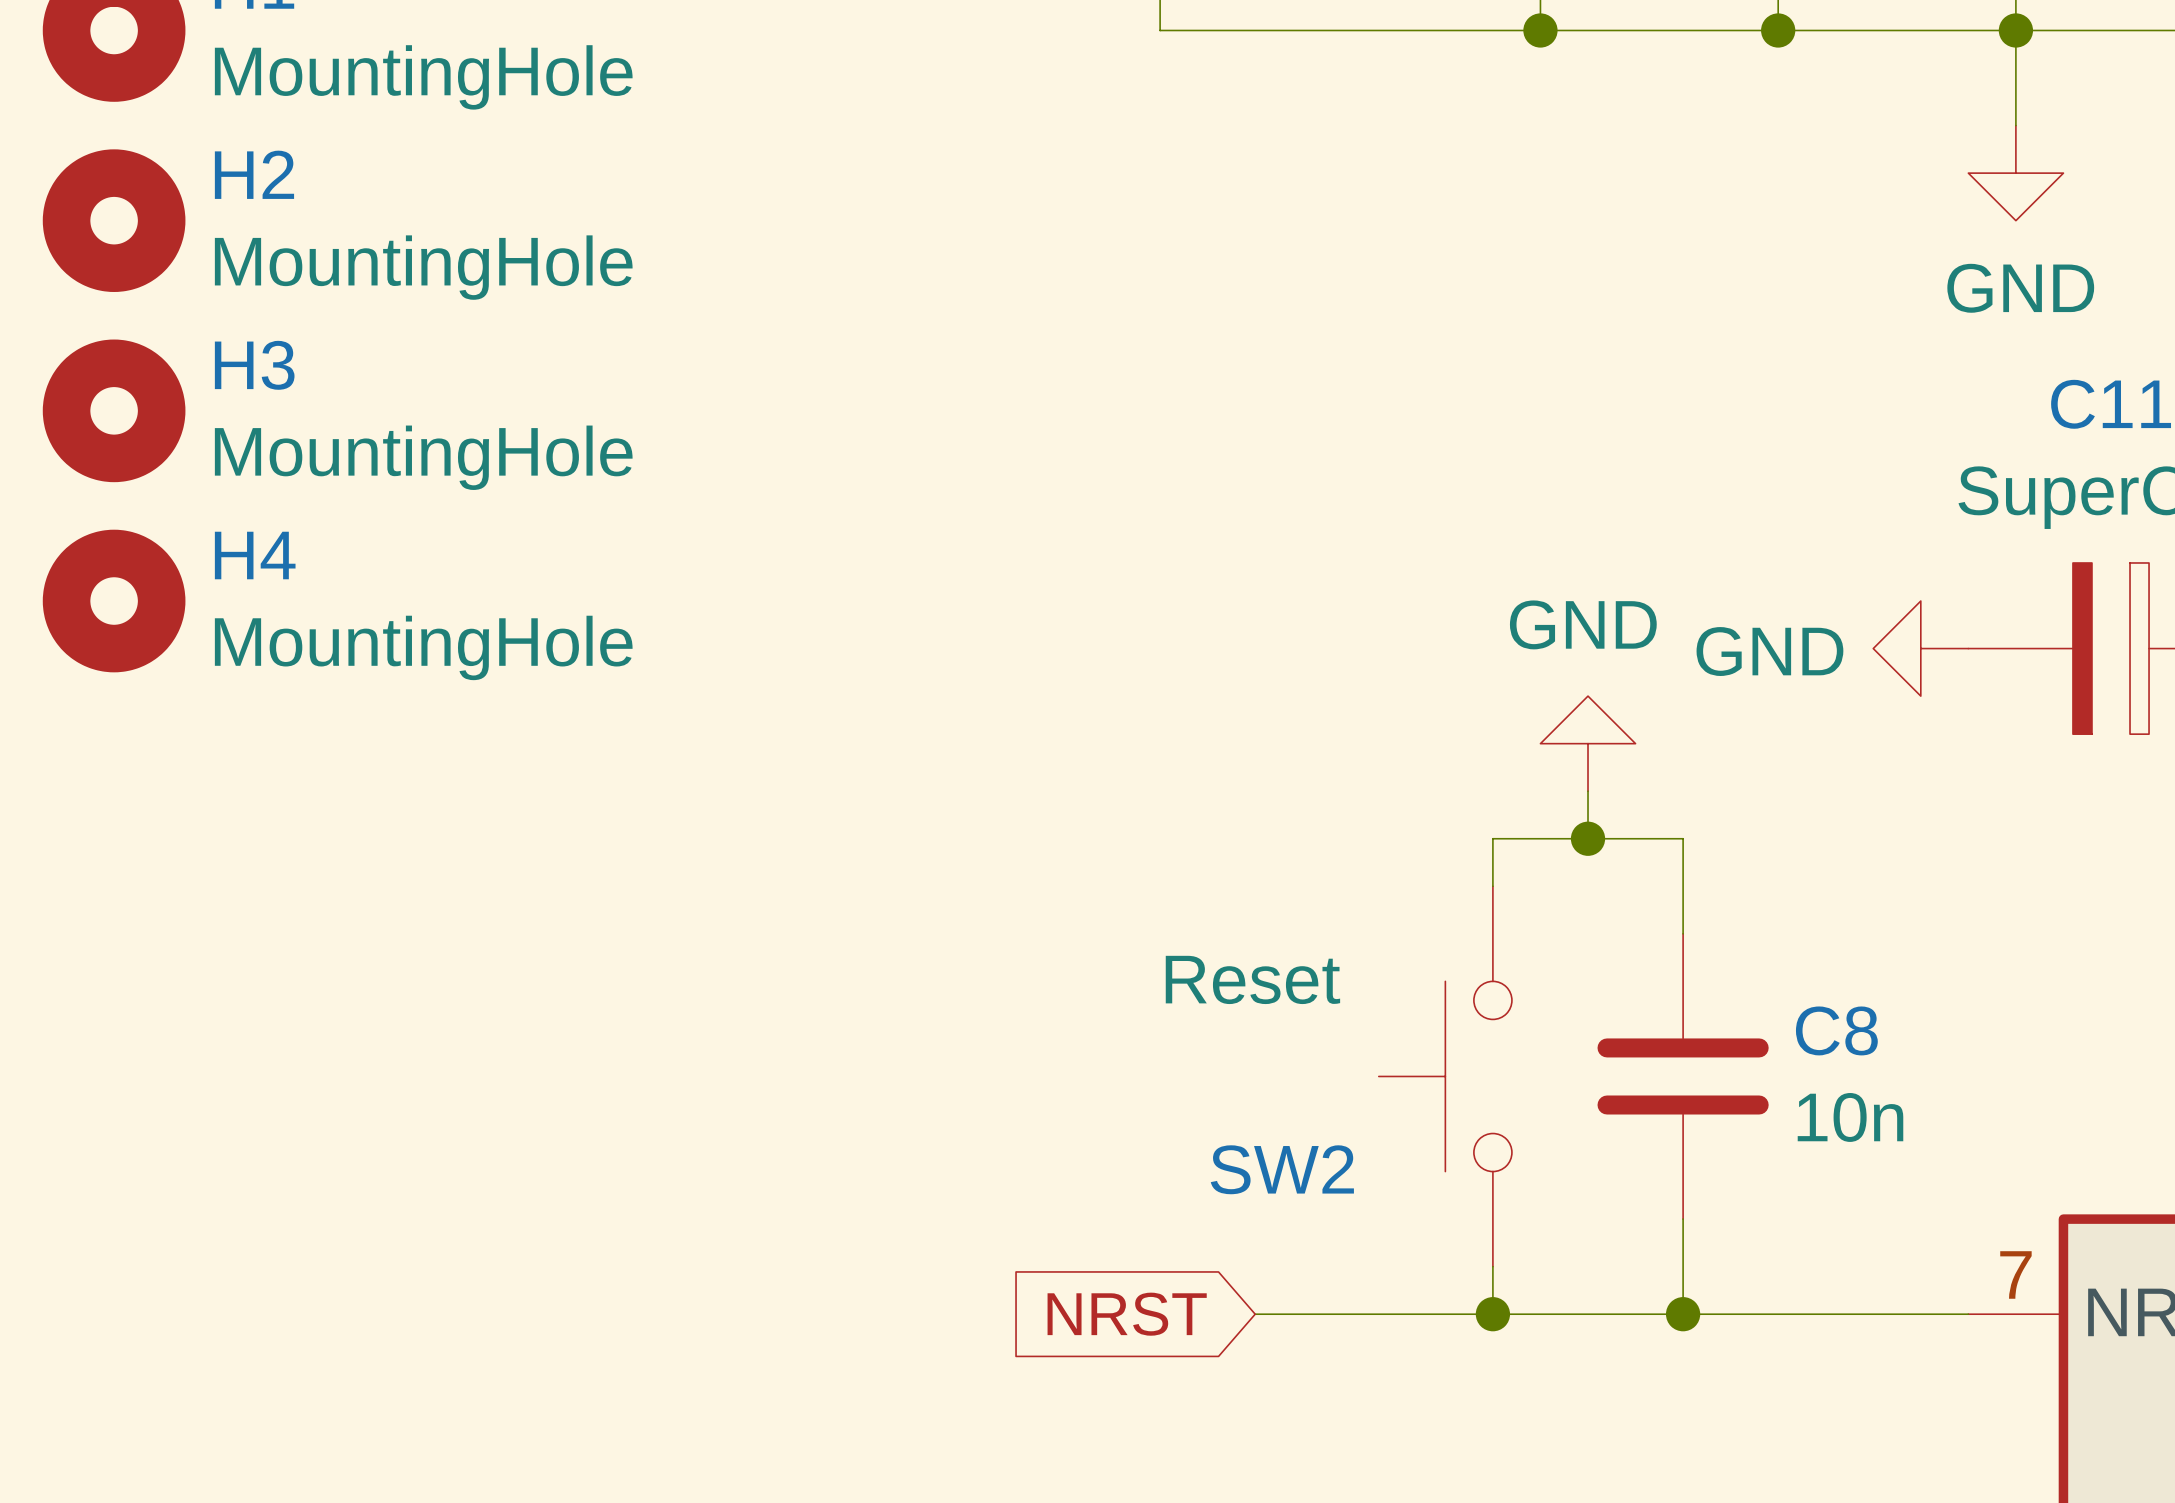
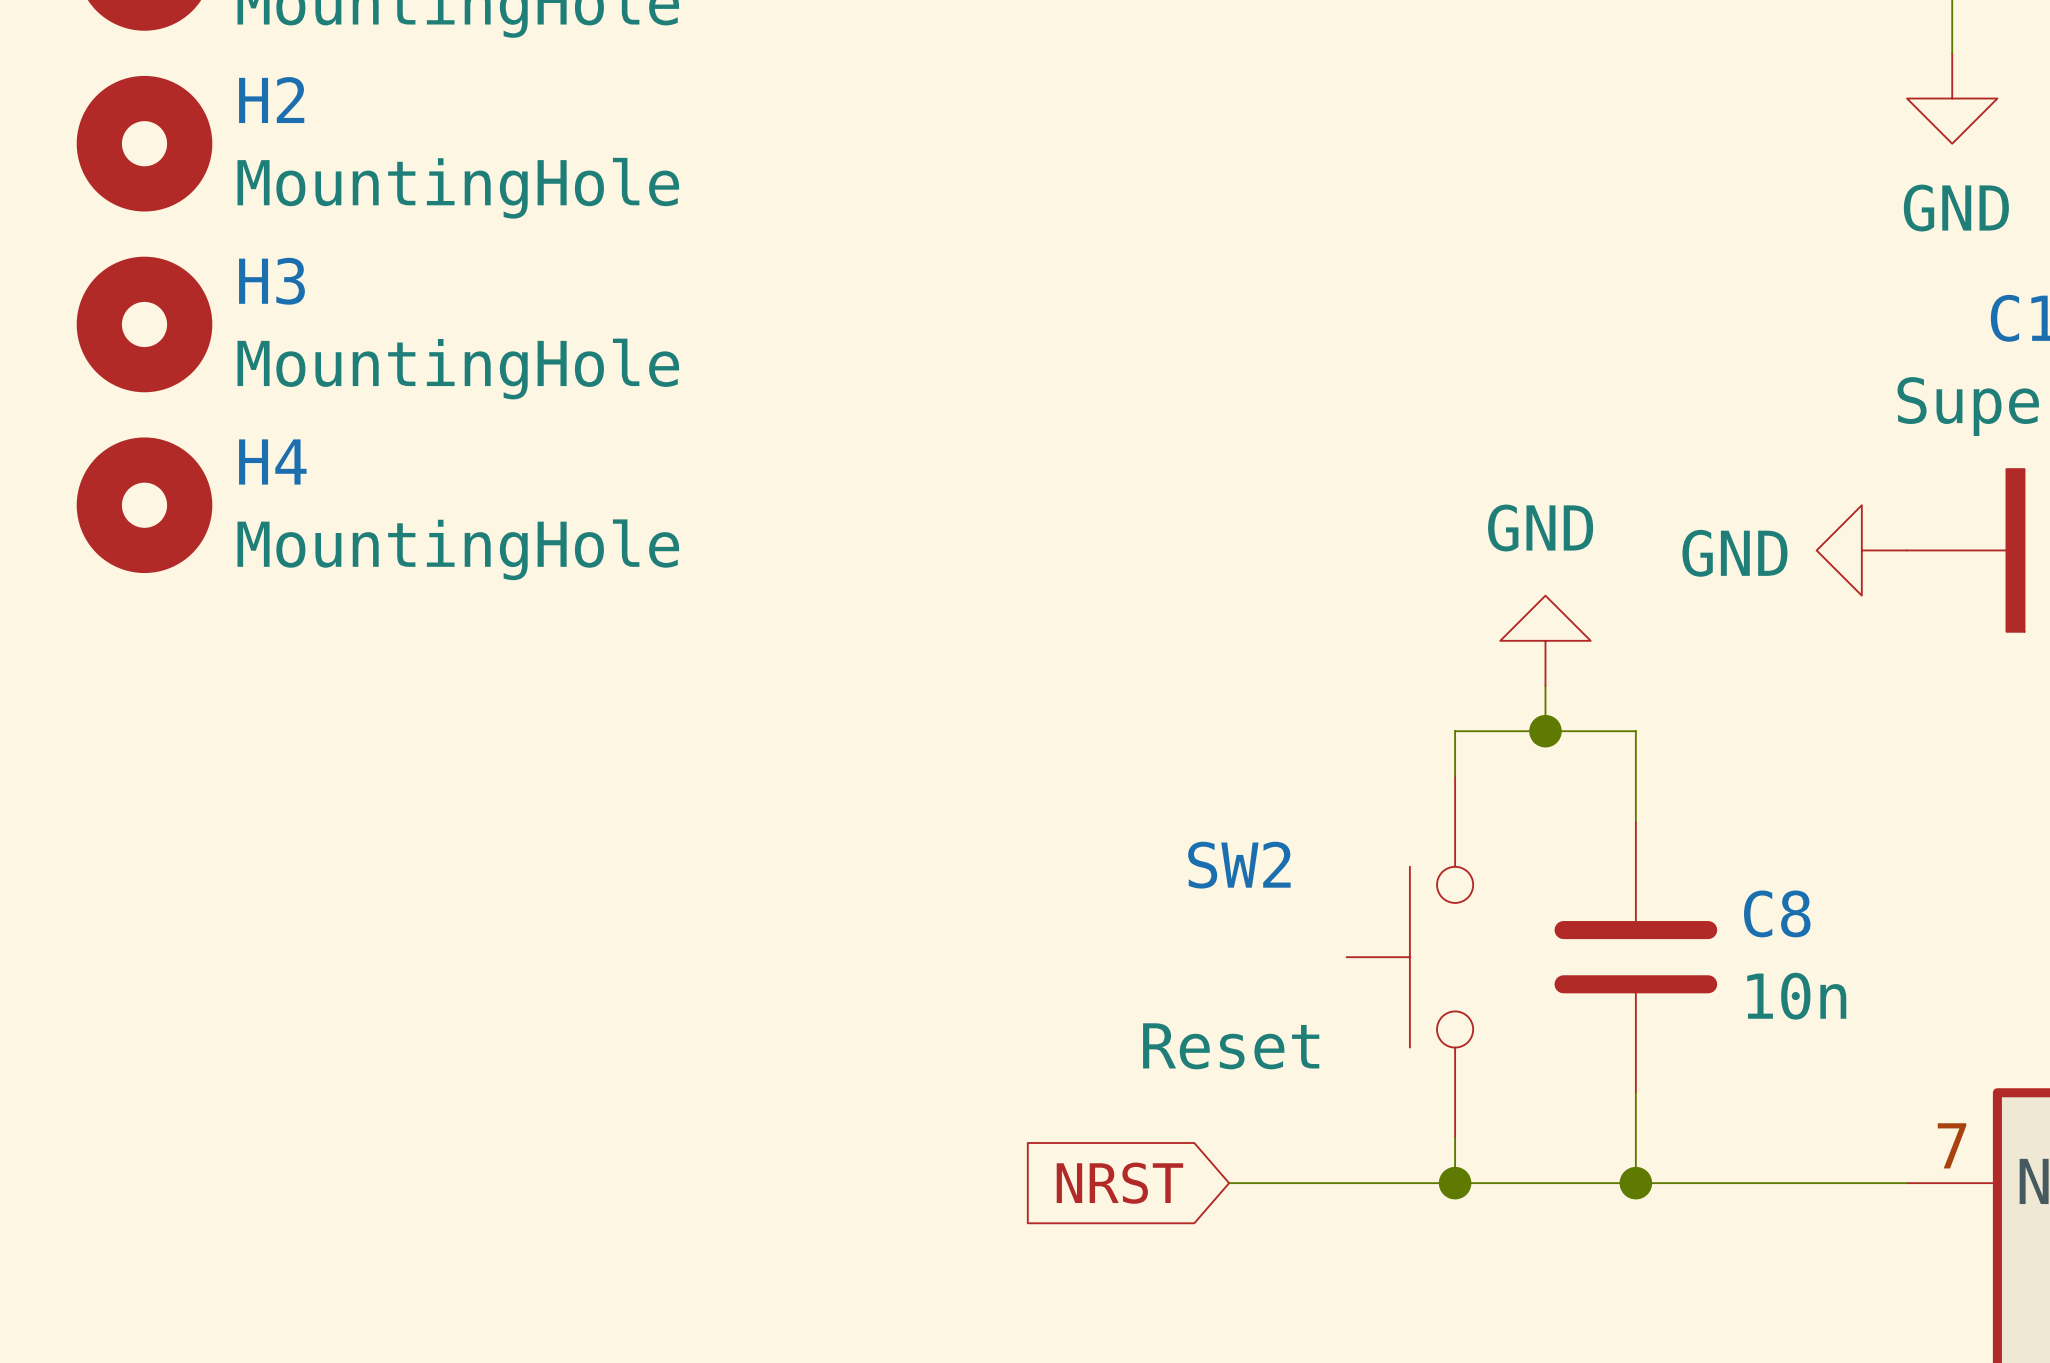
SW2 value position: Reset (1252, 979) -> Reset (1231, 1046)
SW2 name position: SW2 (1282, 1169) -> SW2 (1239, 865)

